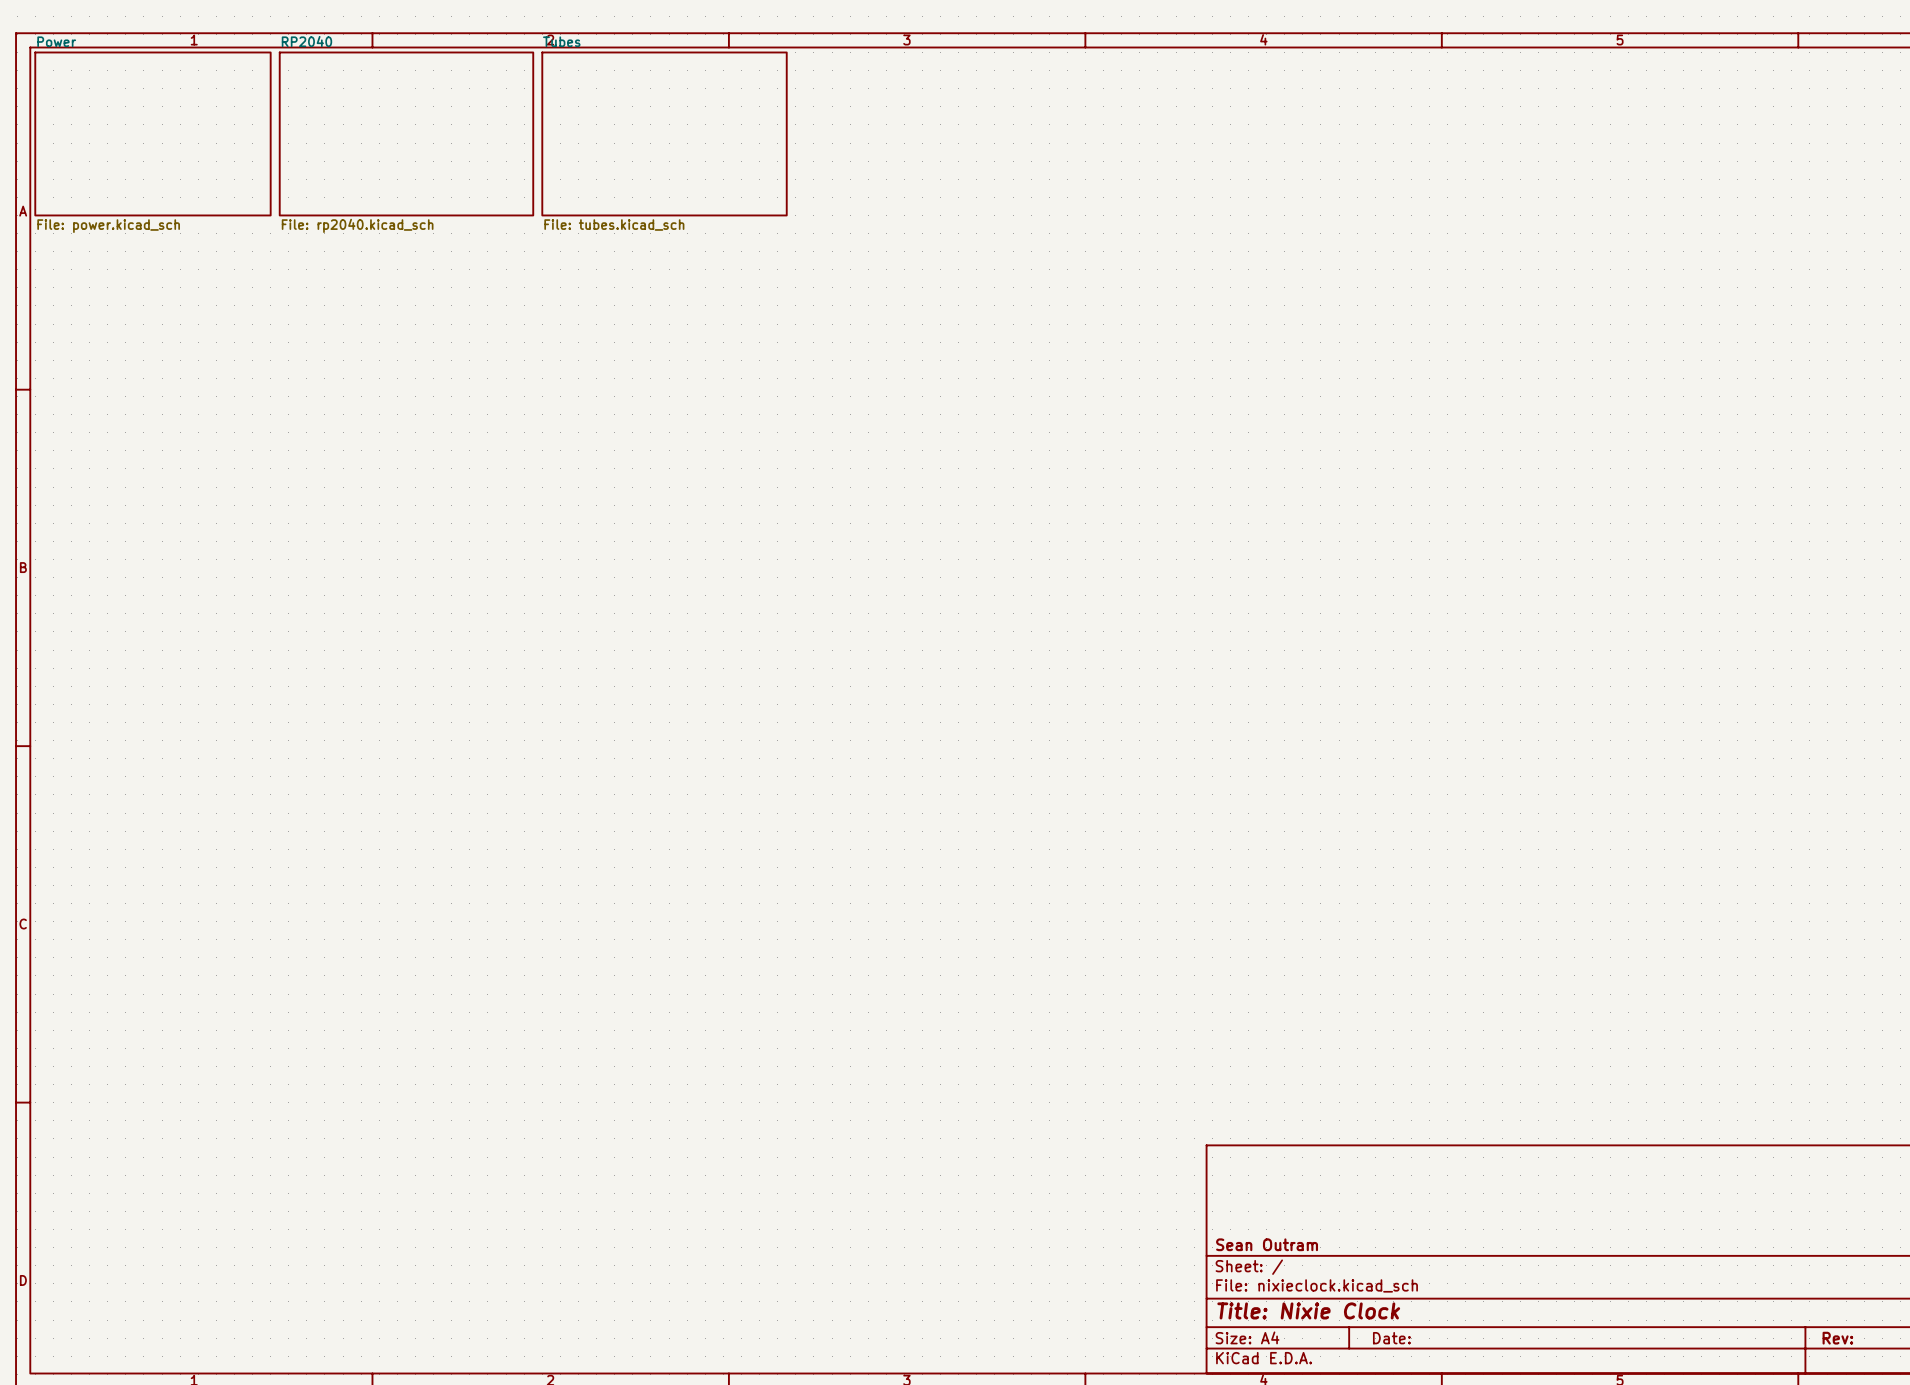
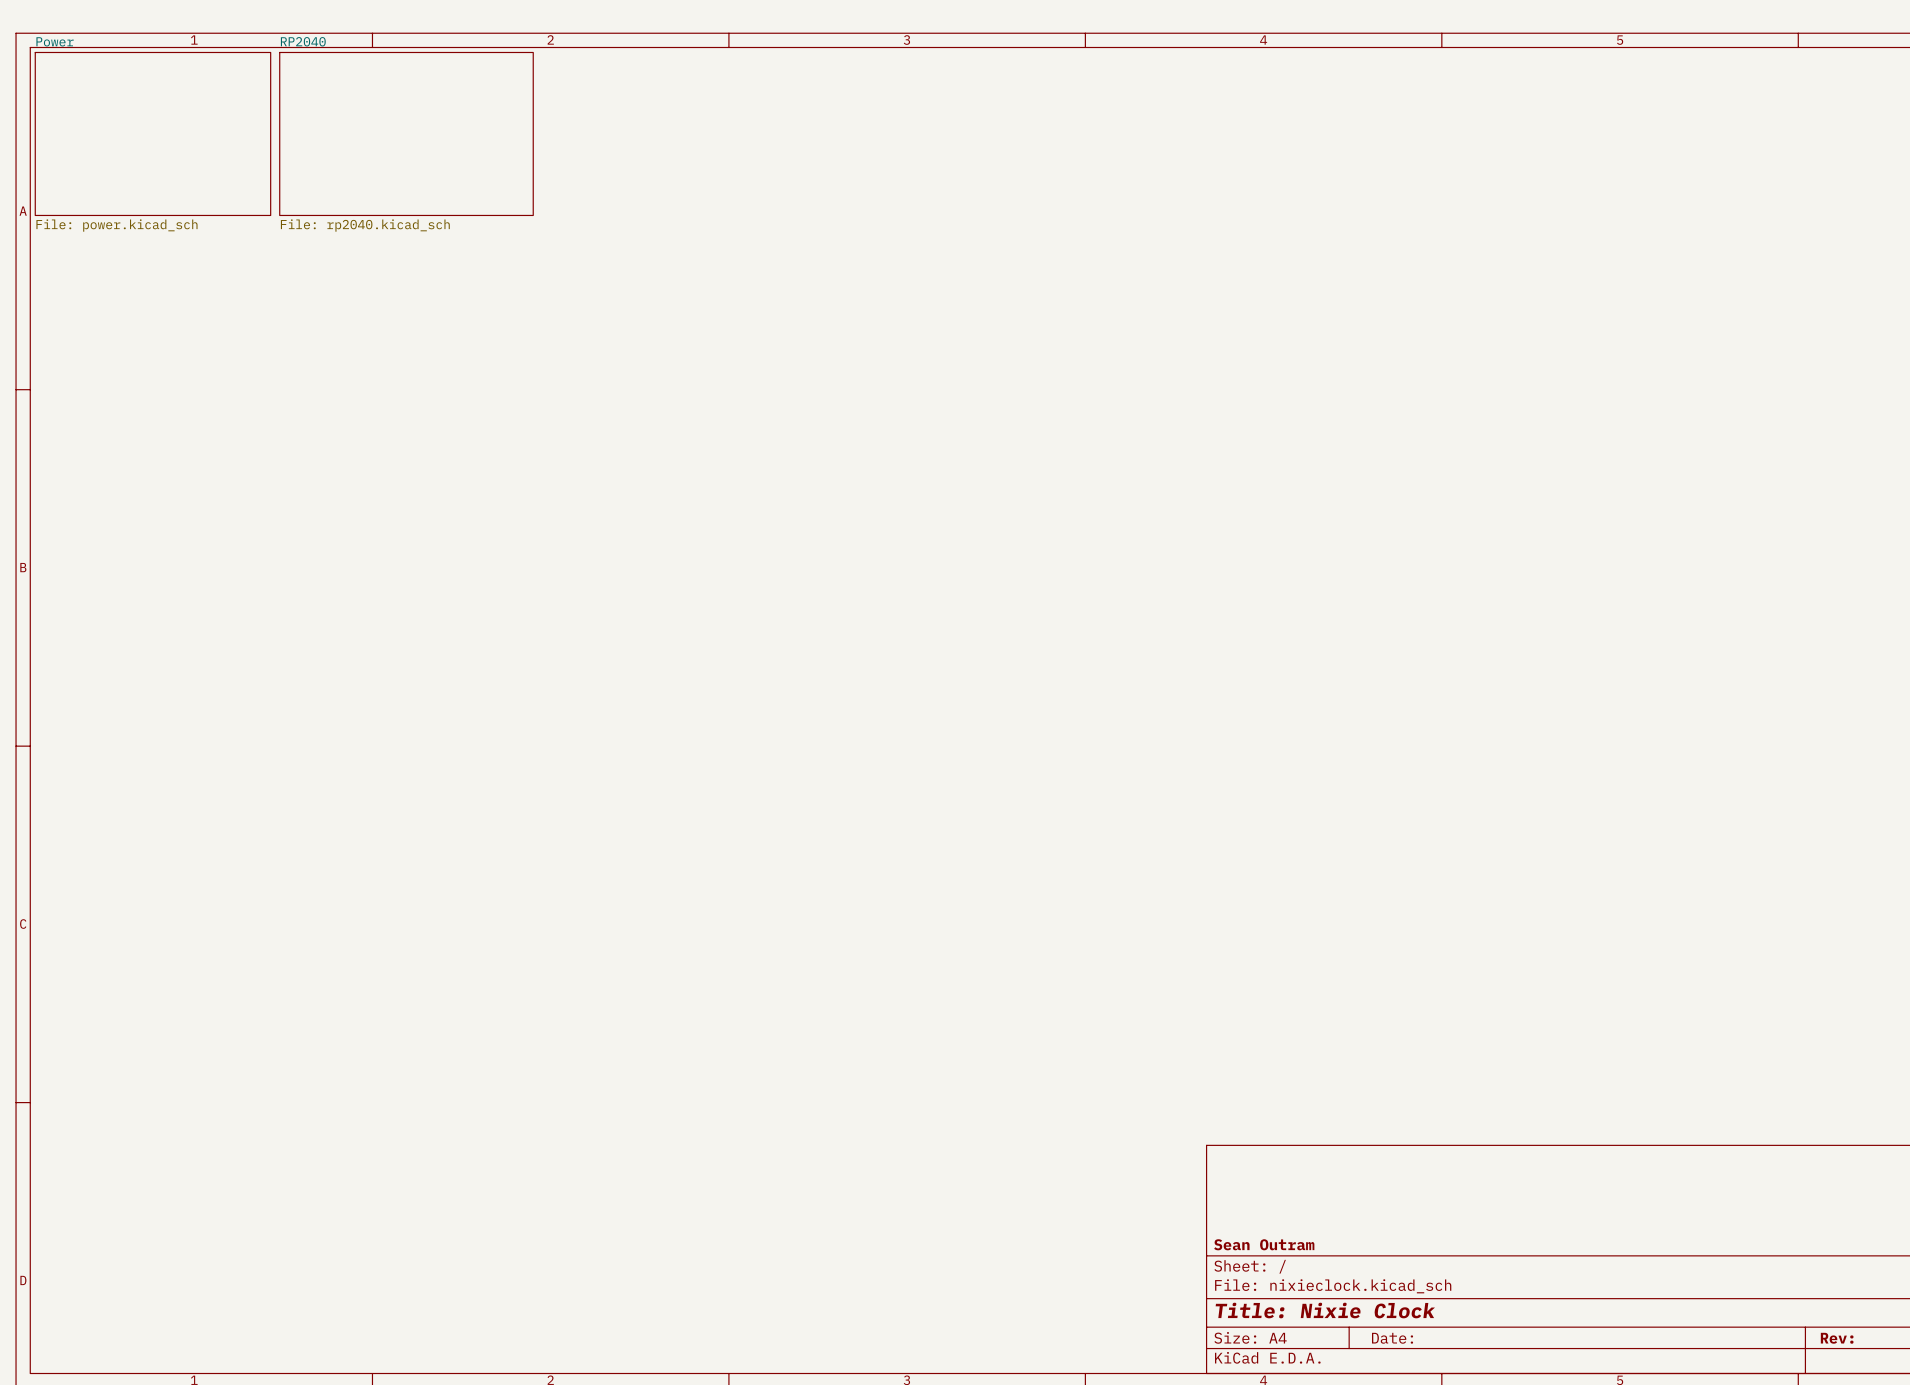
sheet Tubes: File: tubes.kicad_sch (664, 133) -> none

